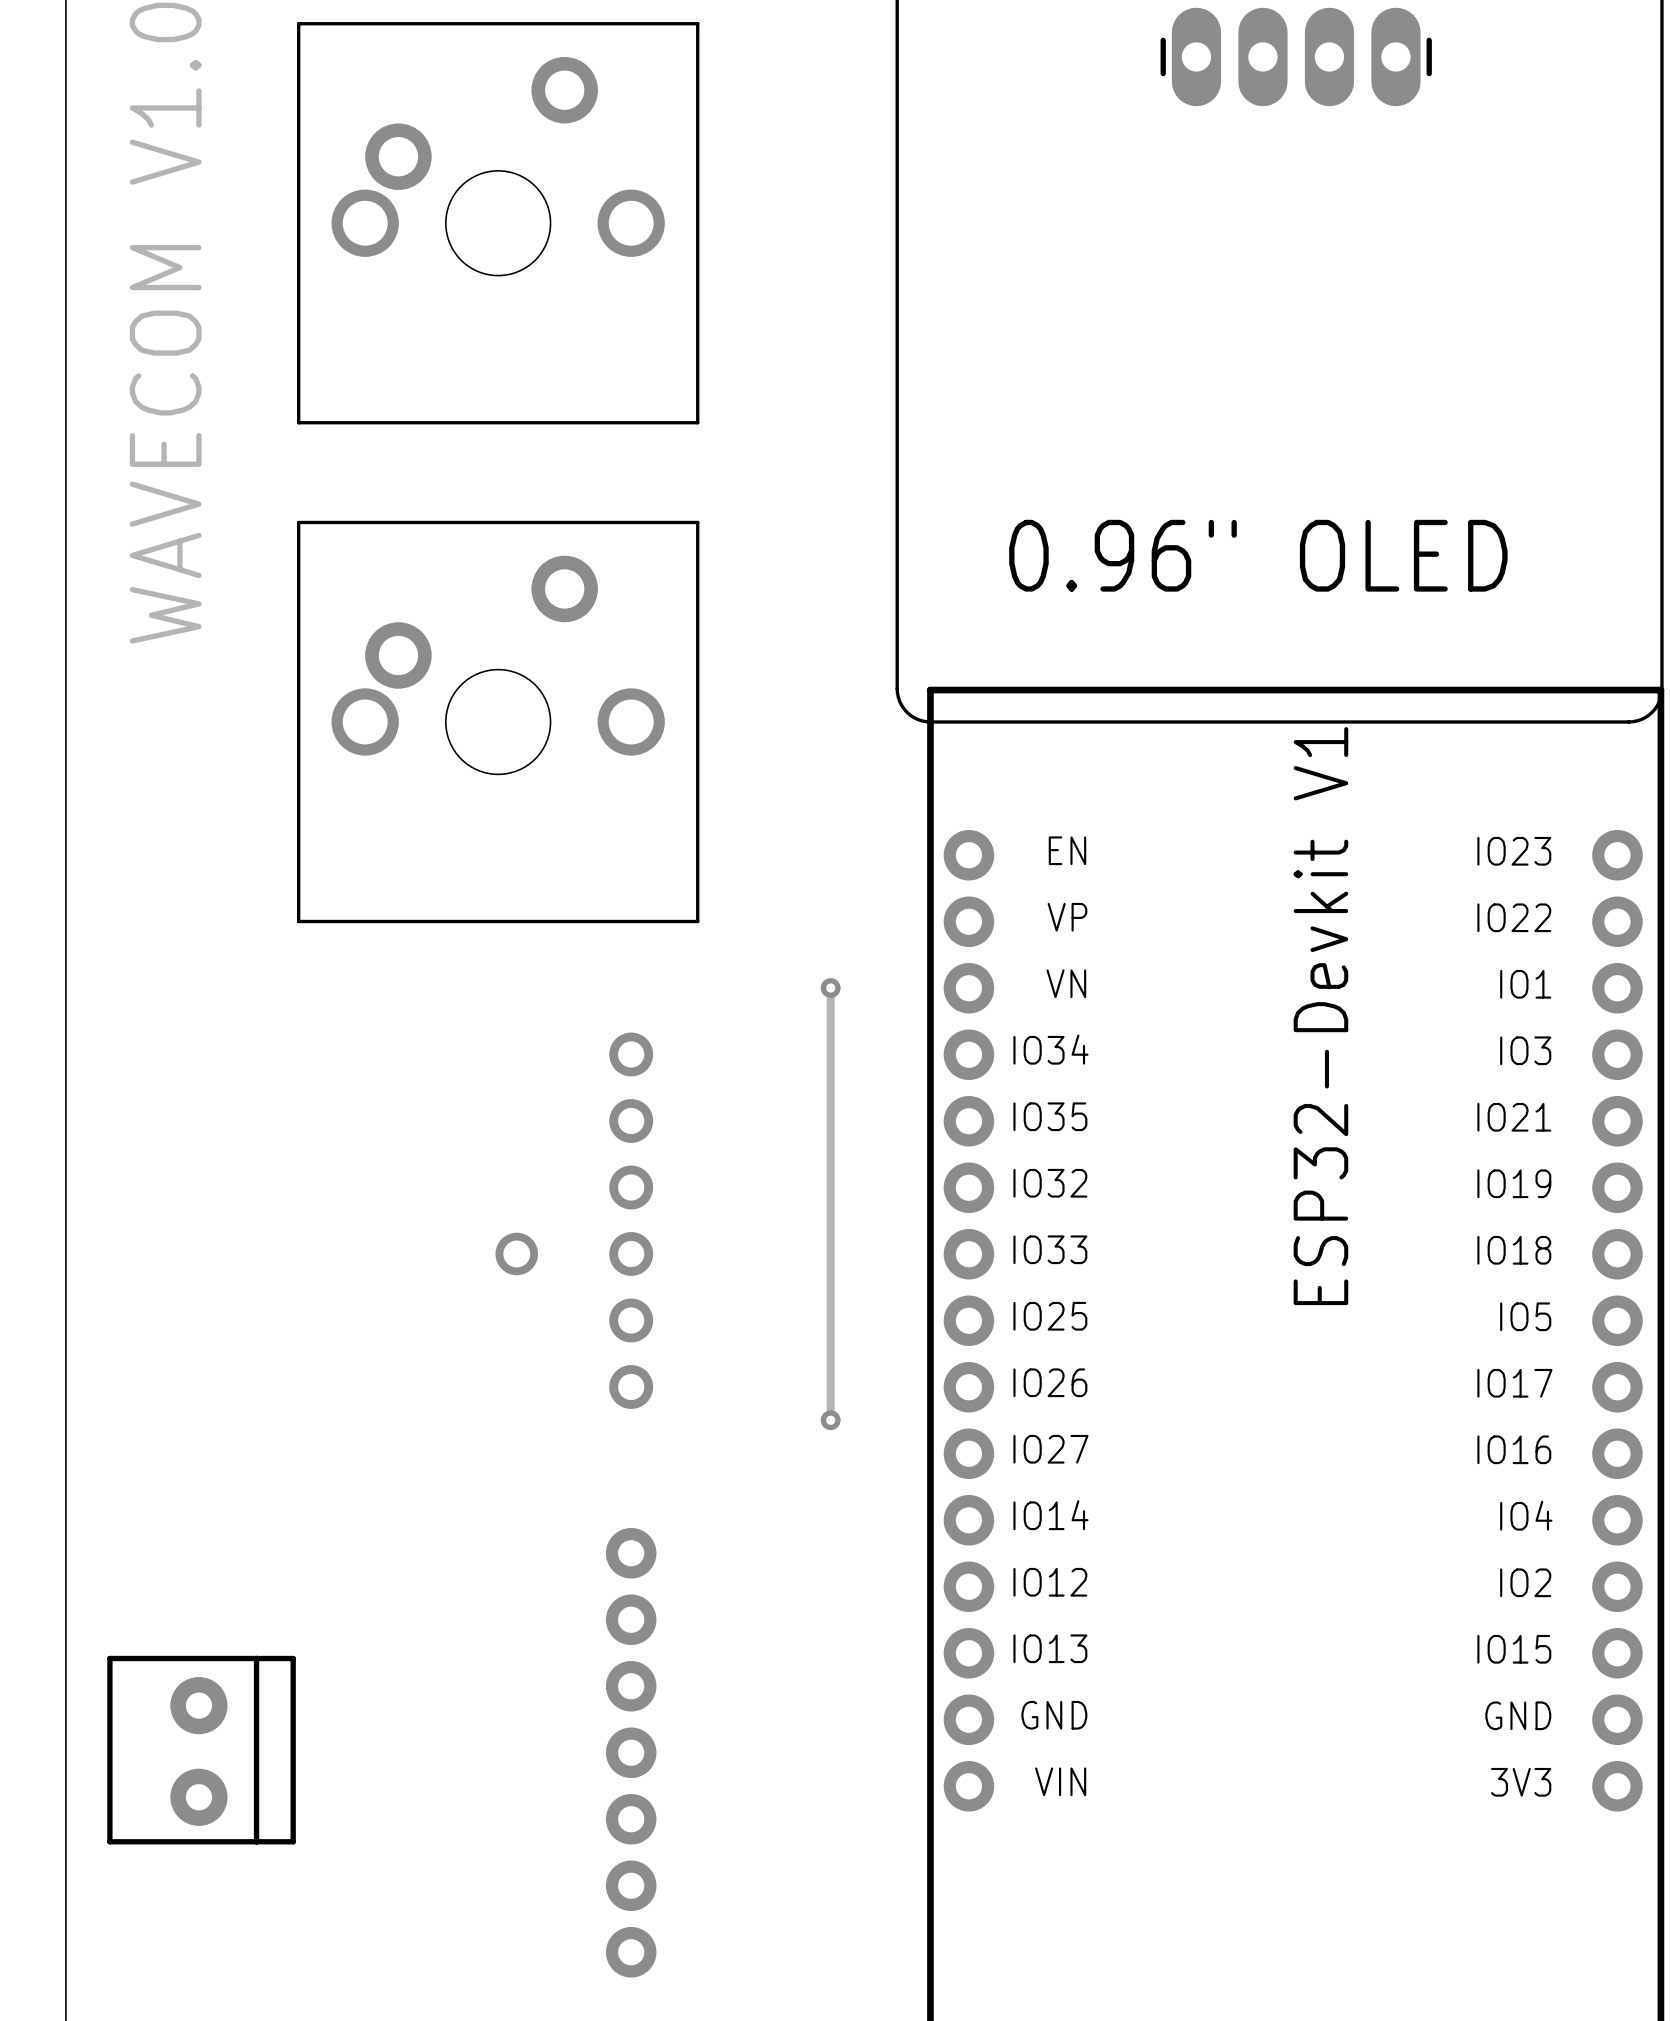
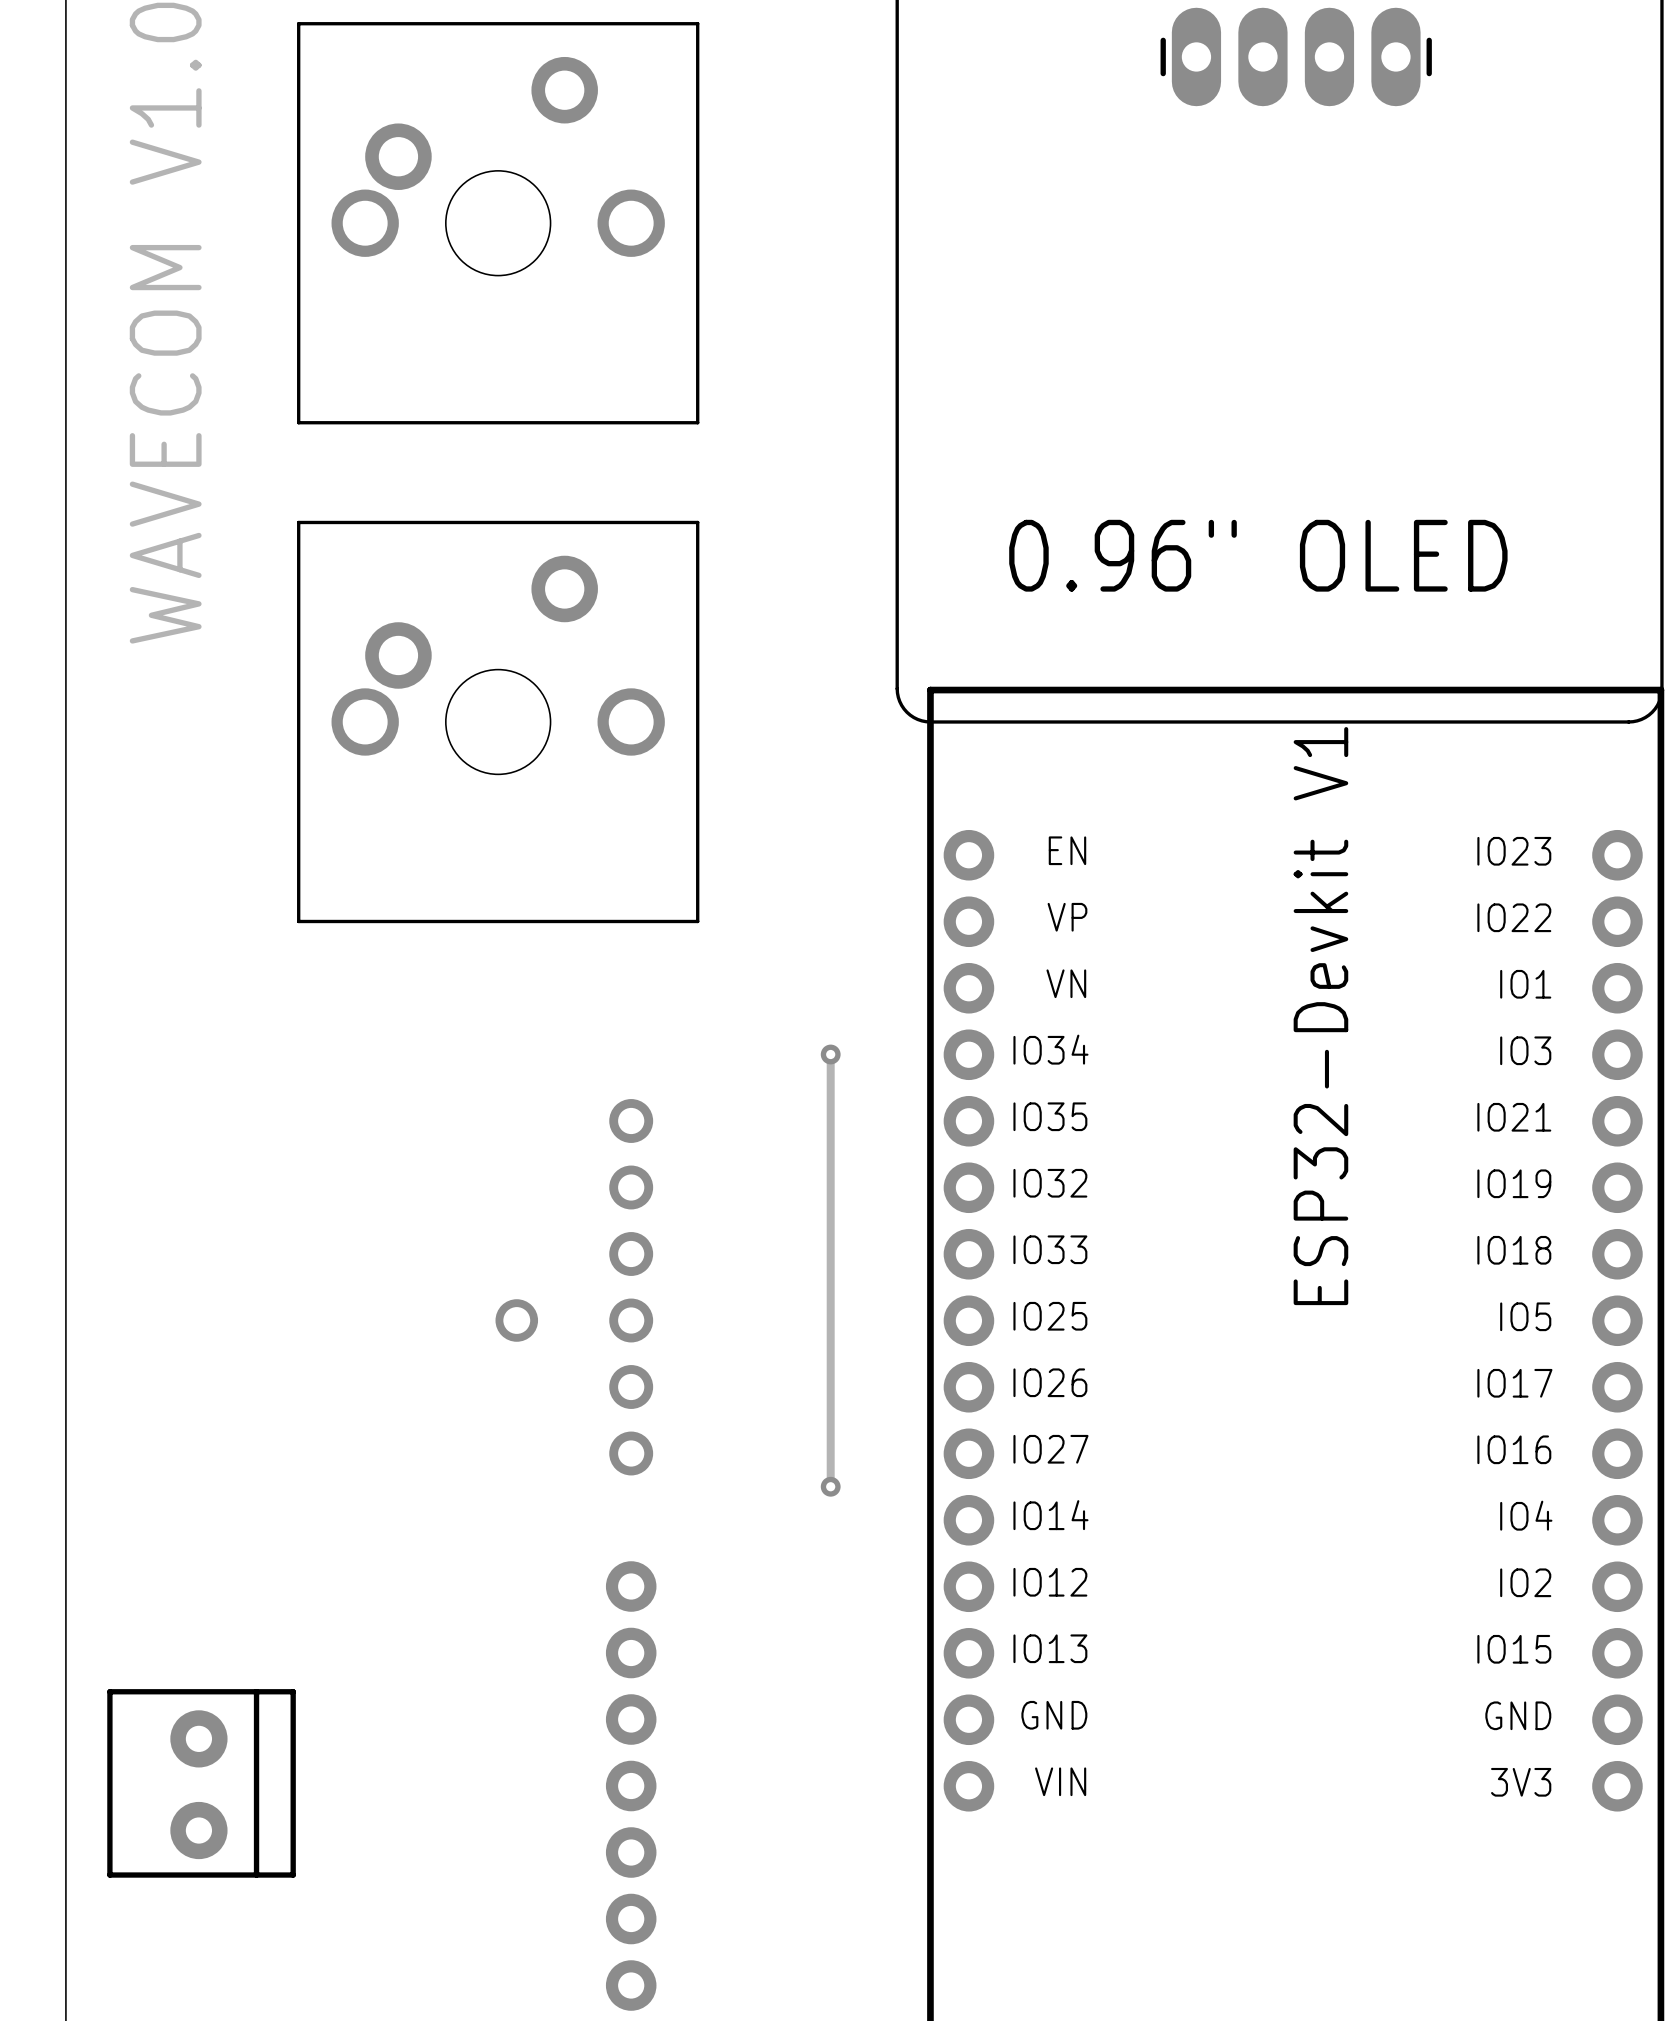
track: (830, 987) (830, 1054) -> (830, 1420) (830, 1486)
via position: (830, 987) -> (830, 1054)
part position: (631, 1220) -> (631, 1287)
part position: (516, 1254) -> (516, 1320)
via position: (830, 1420) -> (830, 1486)
part position: (201, 1750) -> (201, 1783)
part position: (631, 1752) -> (631, 1786)

